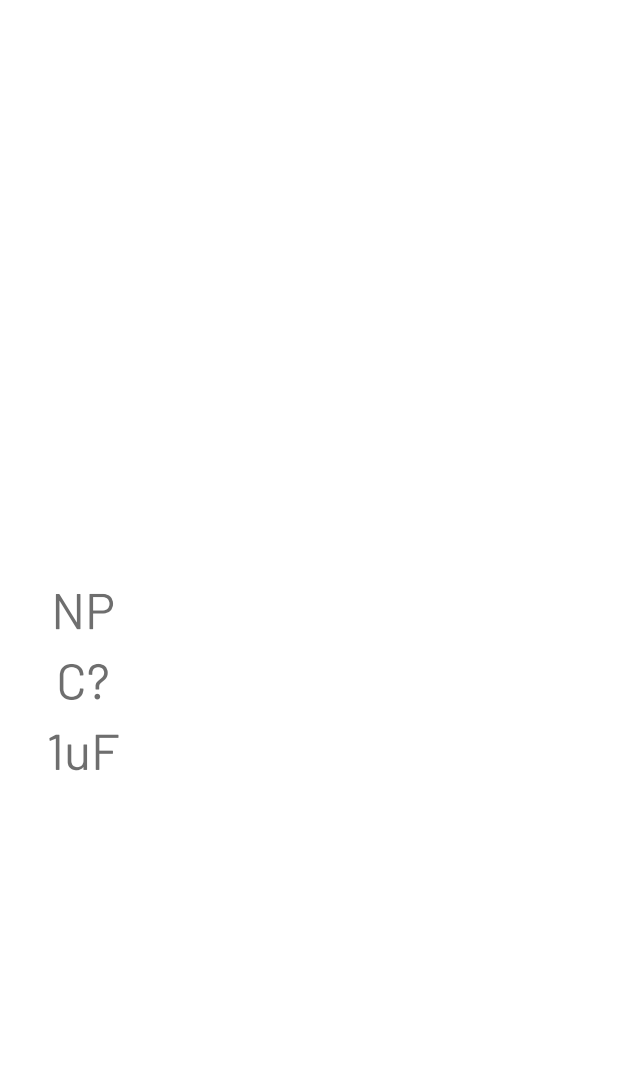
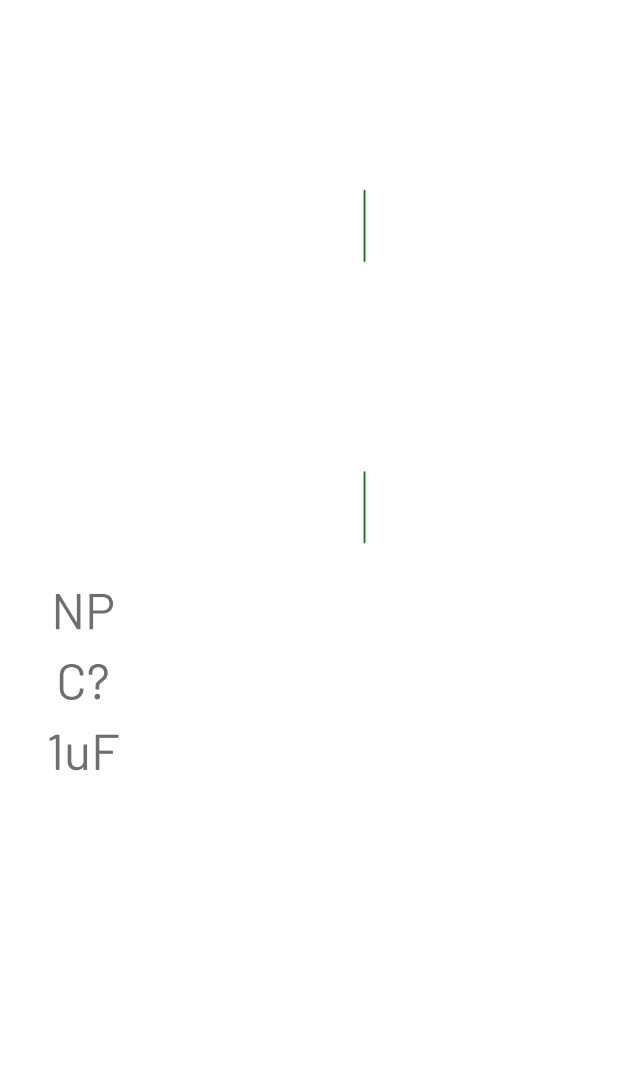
wire: none -> (364, 190) (364, 261)
wire: none -> (364, 472) (364, 542)

